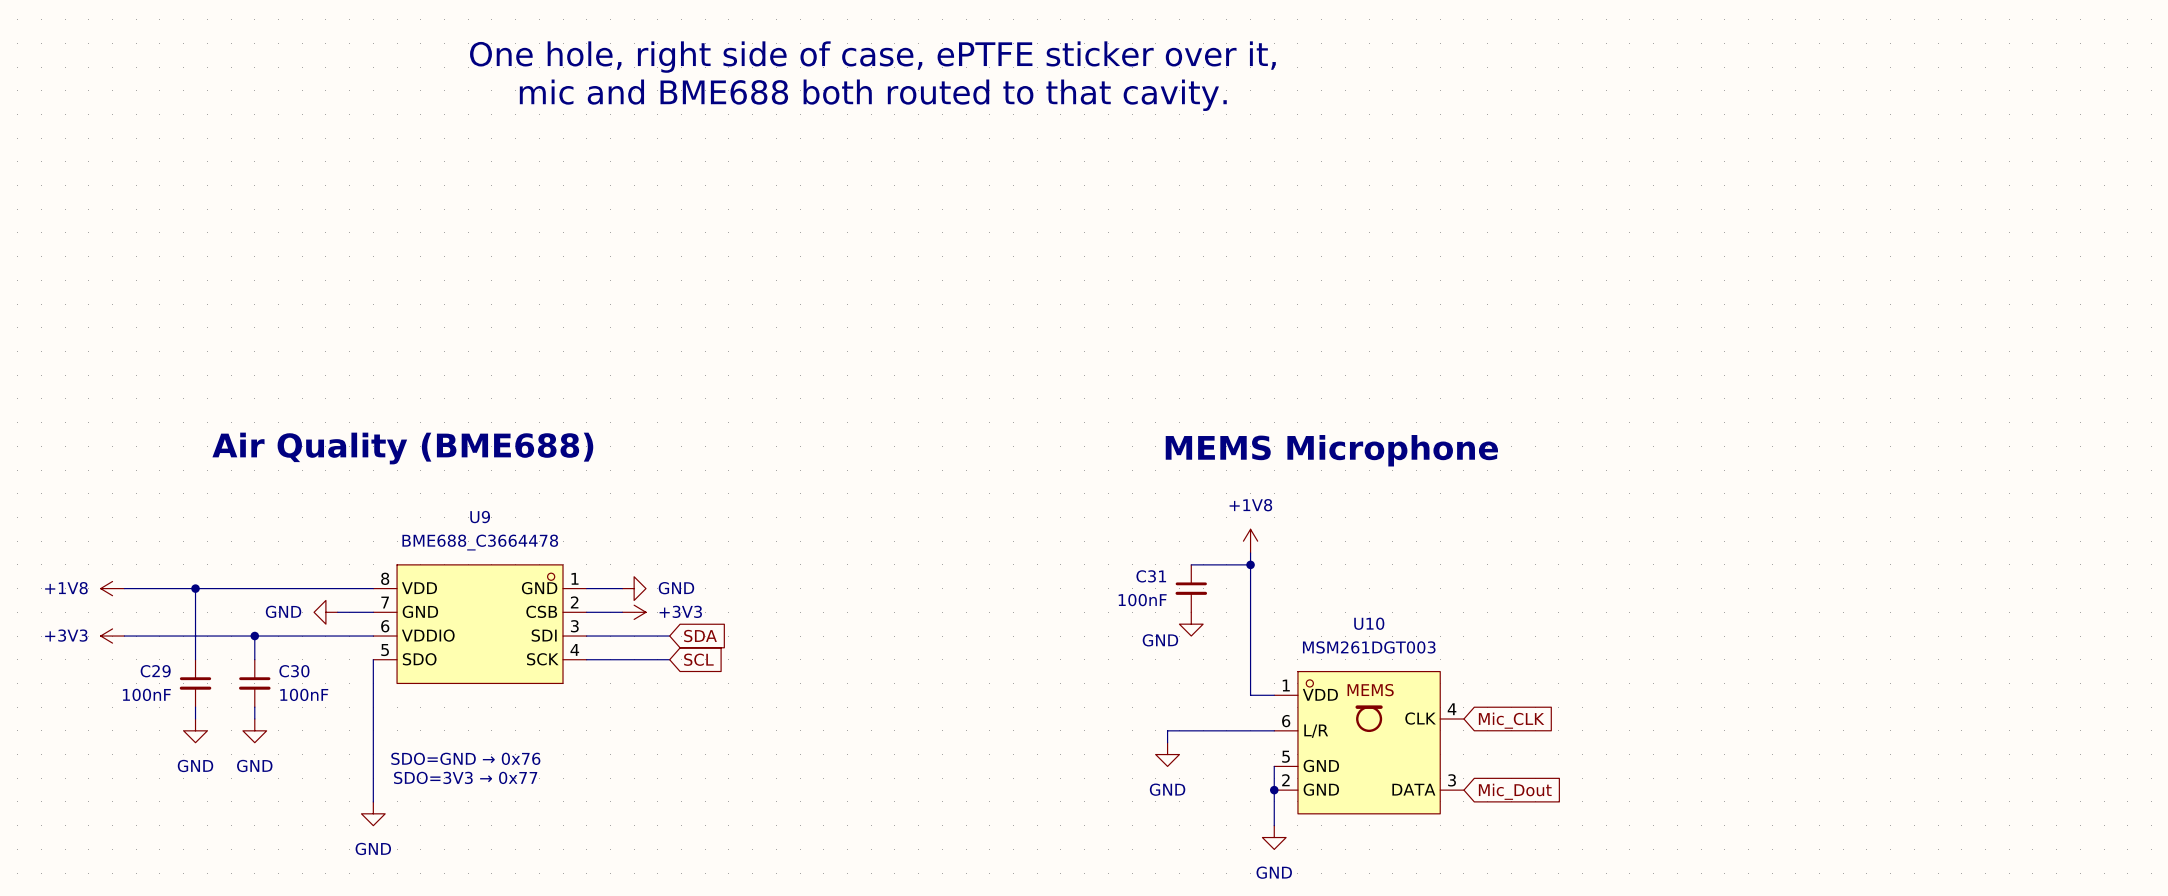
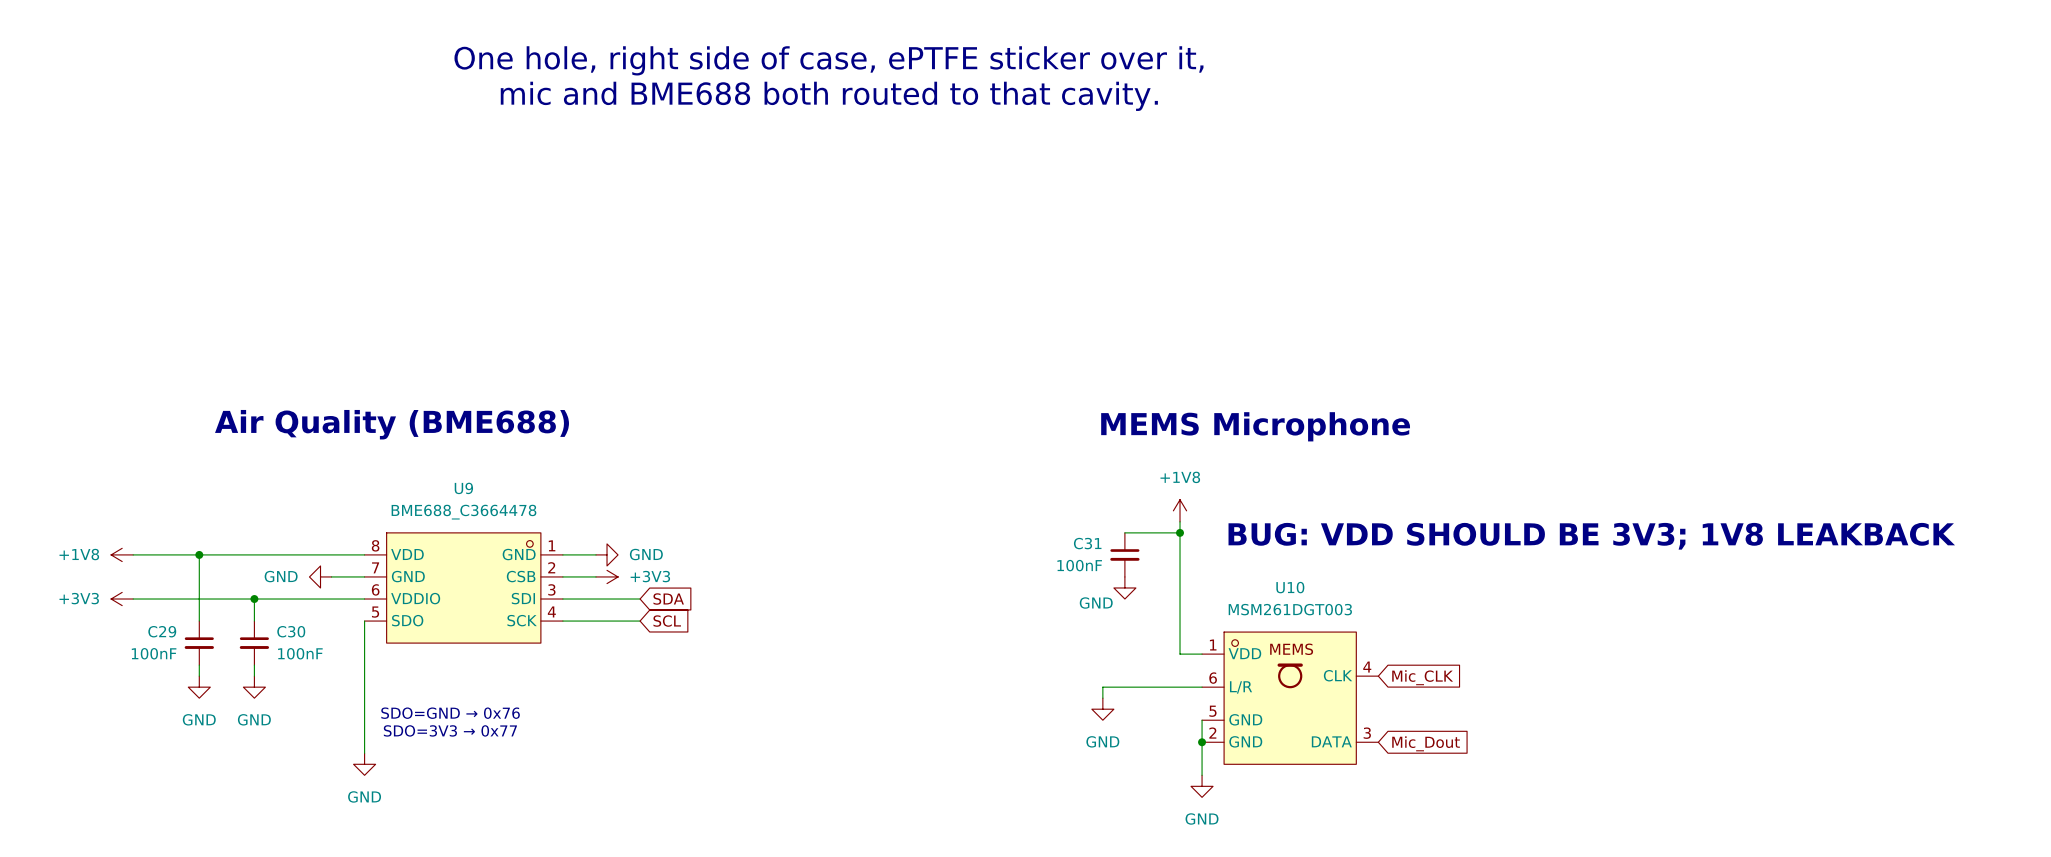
text: none -> BUG: VDD SHOULD BE 3V3; 1V8 LEAKBACK (1591, 536)

